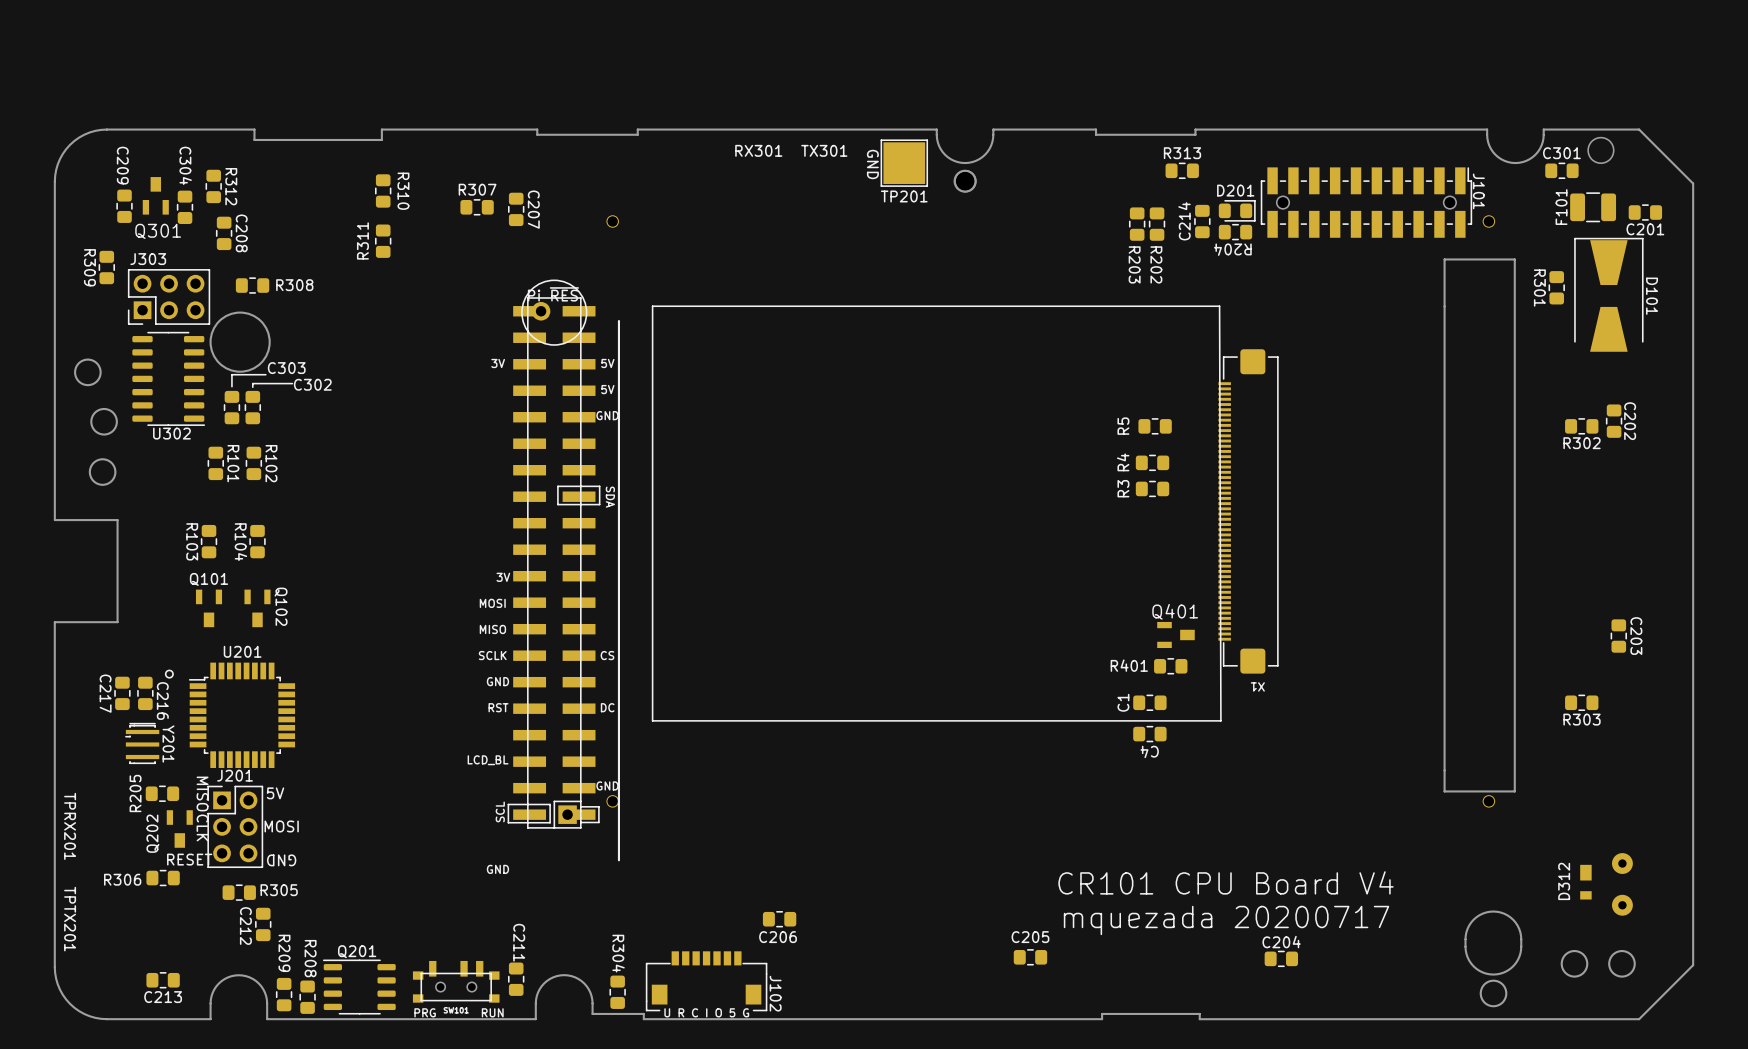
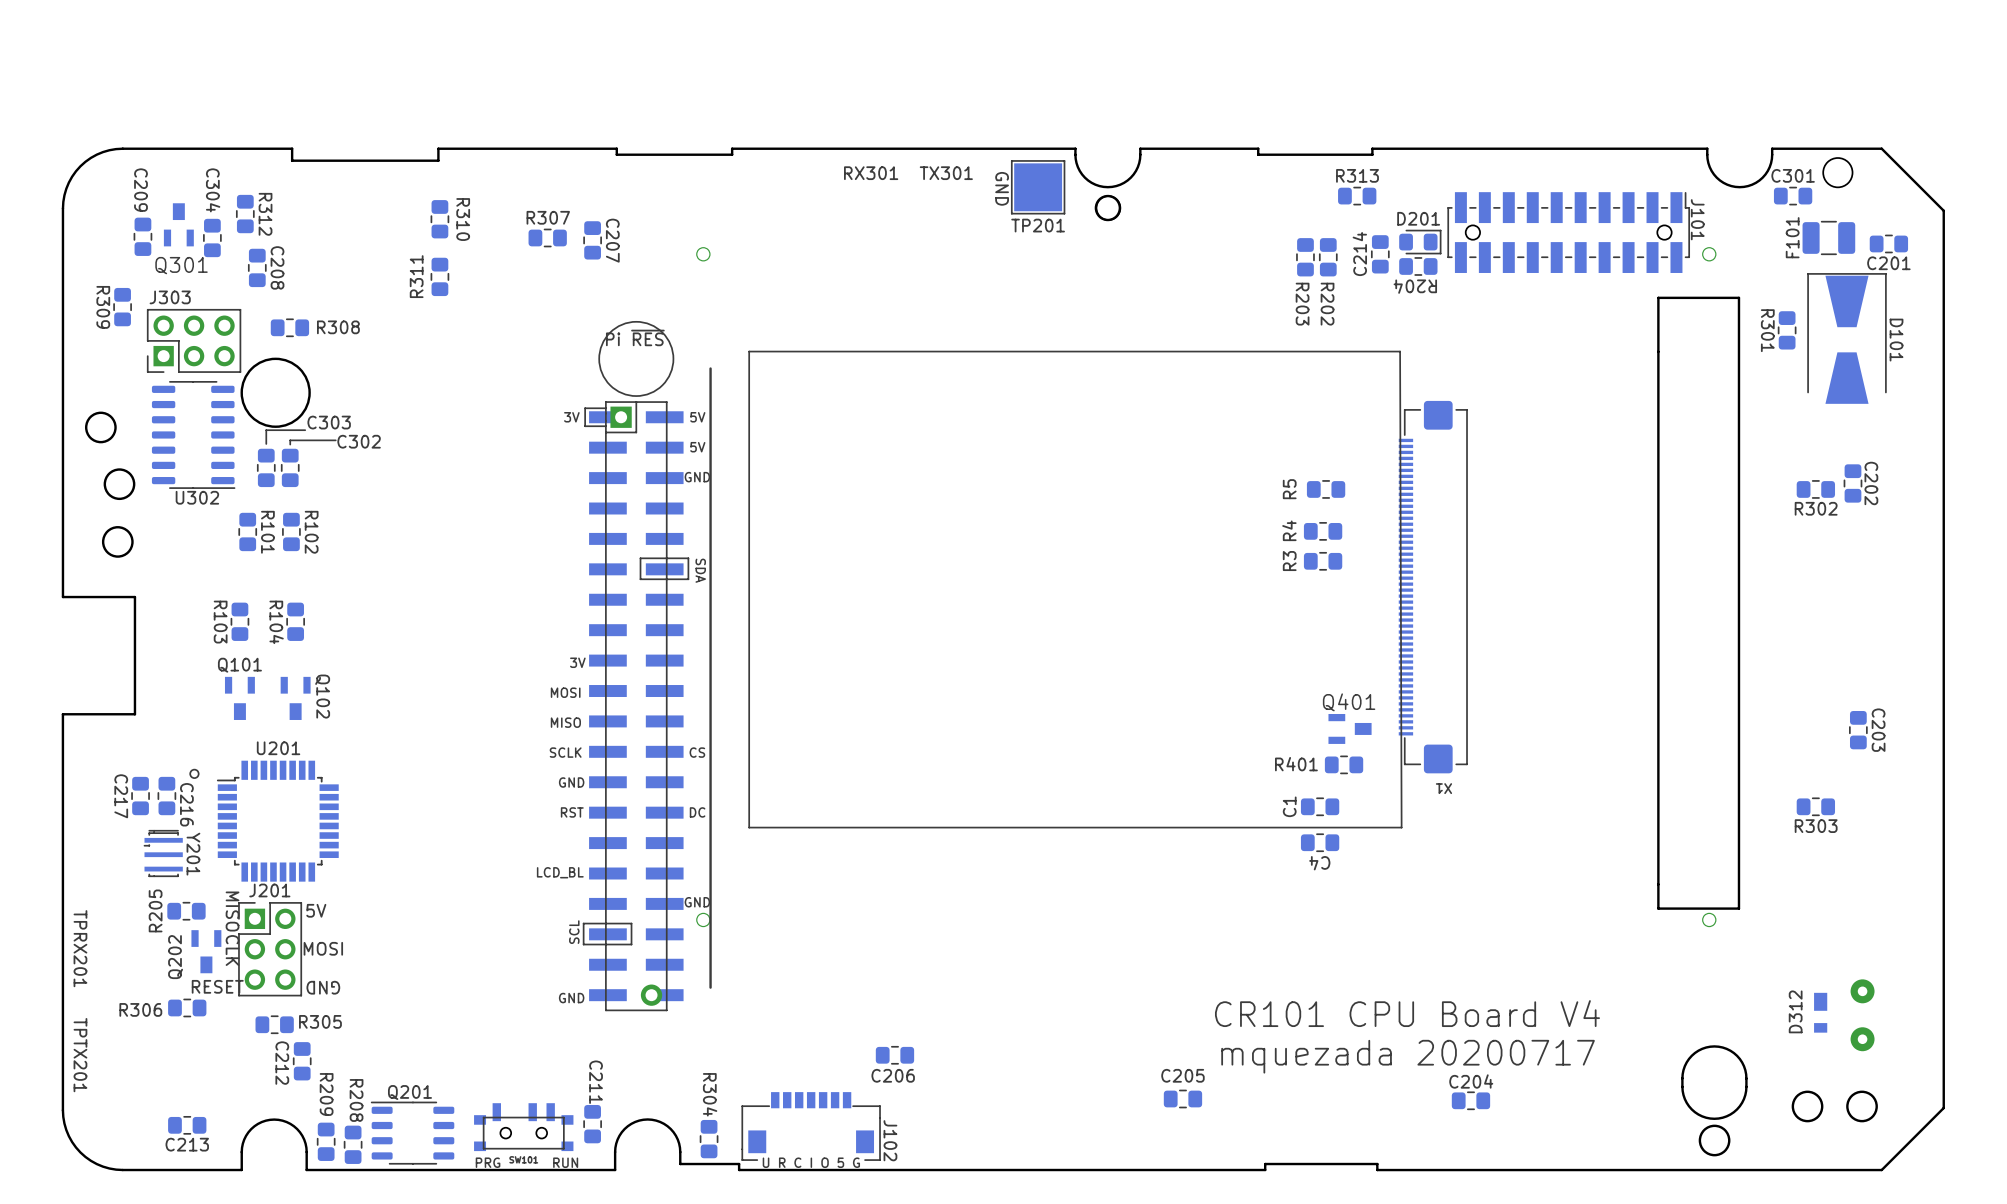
part rotation: 0° (556, 562) -> 180° (633, 706)

